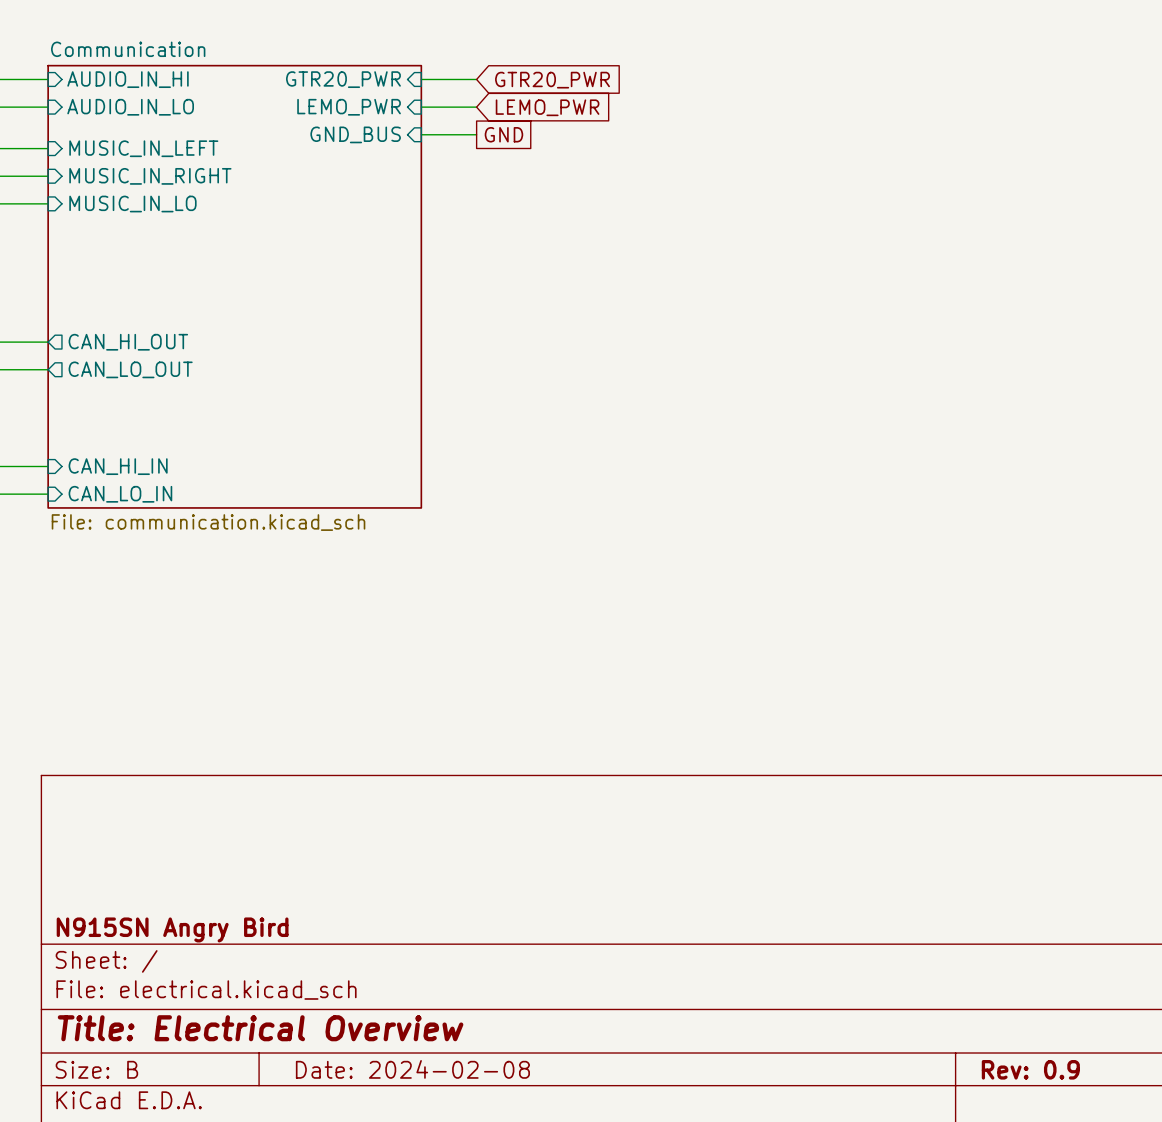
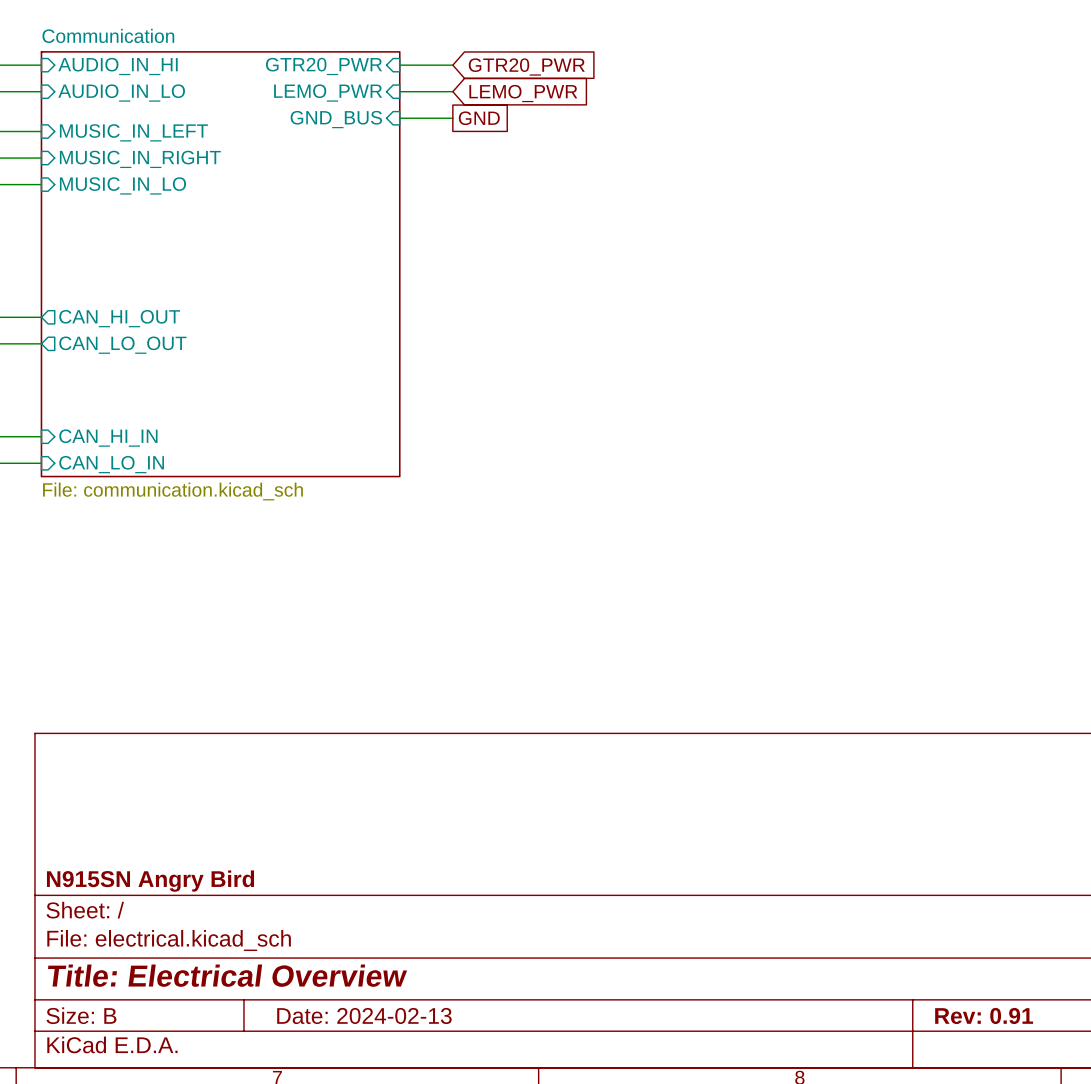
title block: Date: 2024-02-08 (412, 1069) -> Date: 2024-02-13 (364, 1015)
title block: Rev: 0.9 (1030, 1069) -> Rev: 0.91 (984, 1015)

